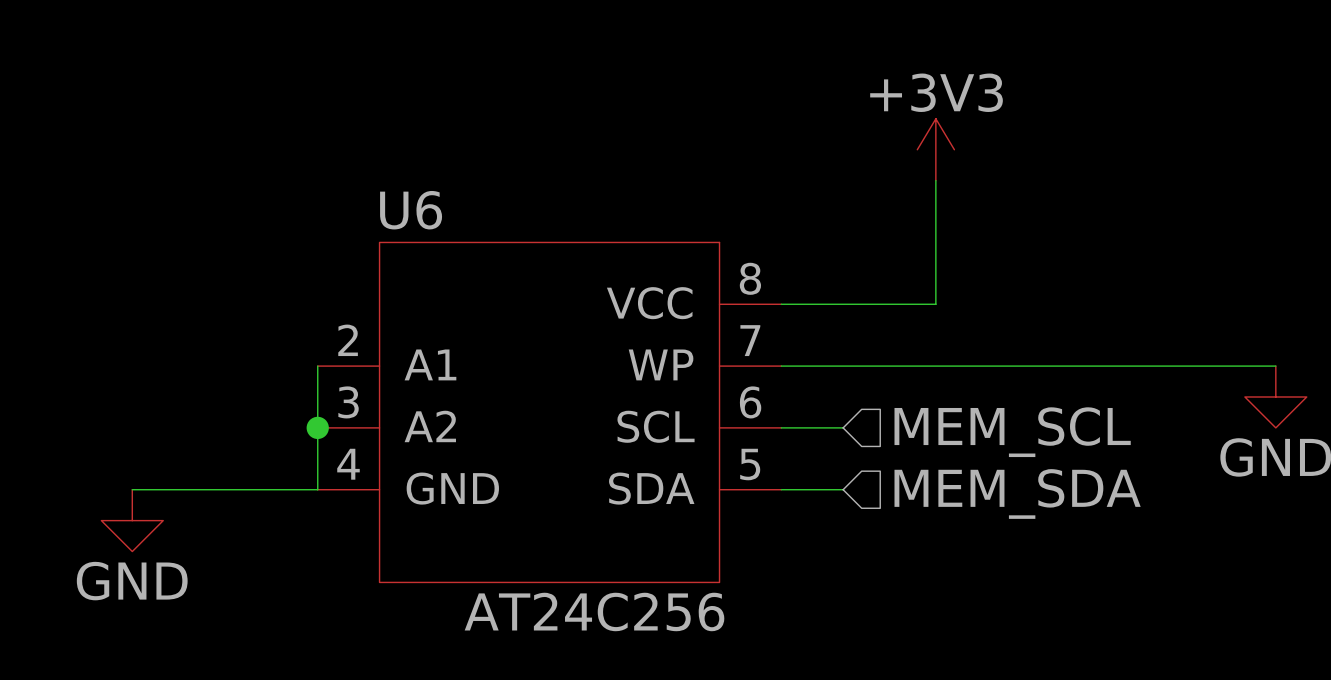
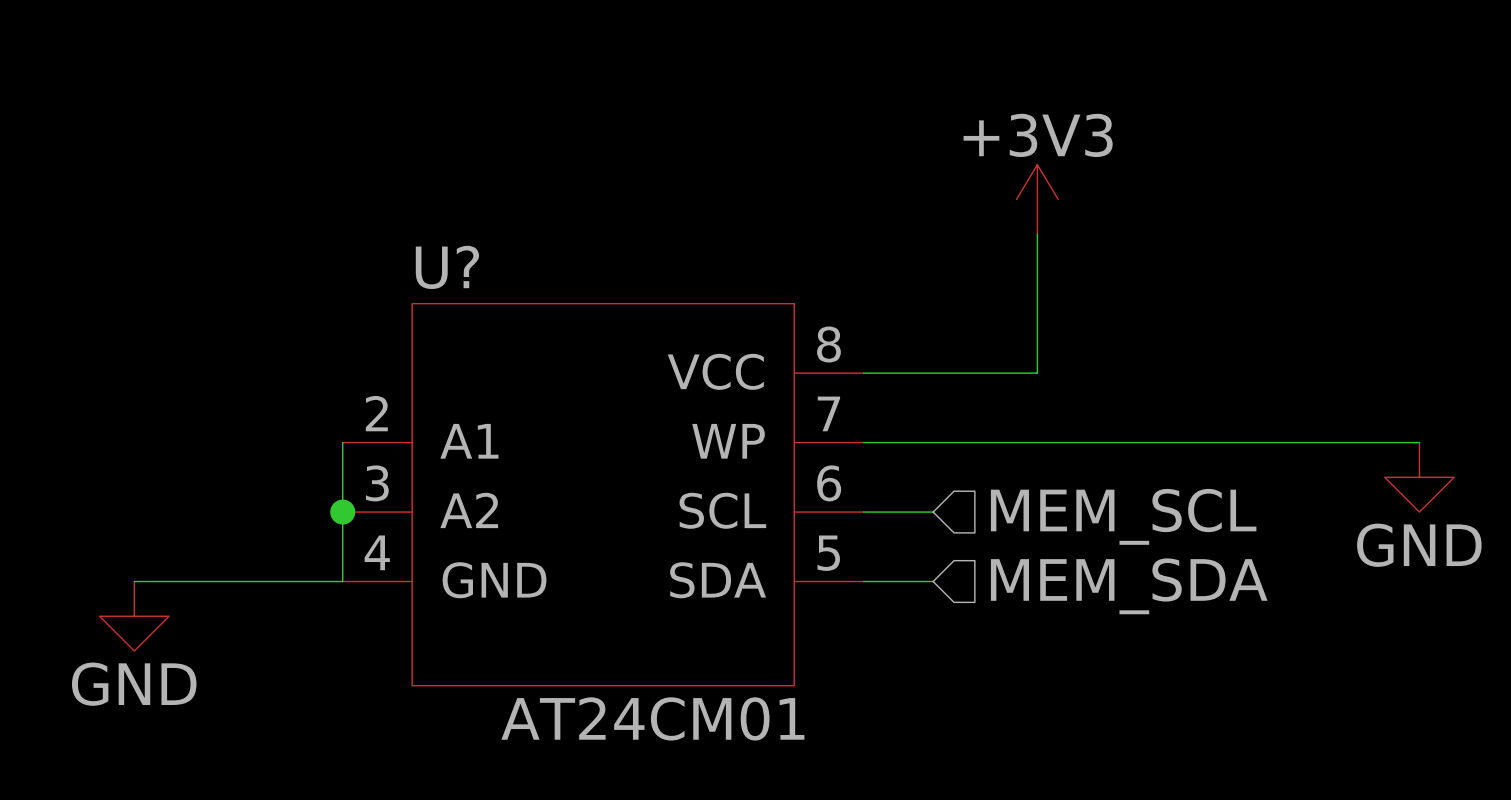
U6 name: U6 (411, 210) -> U? (447, 267)
U6 value: AT24C256 (594, 611) -> AT24CM01 (652, 718)

